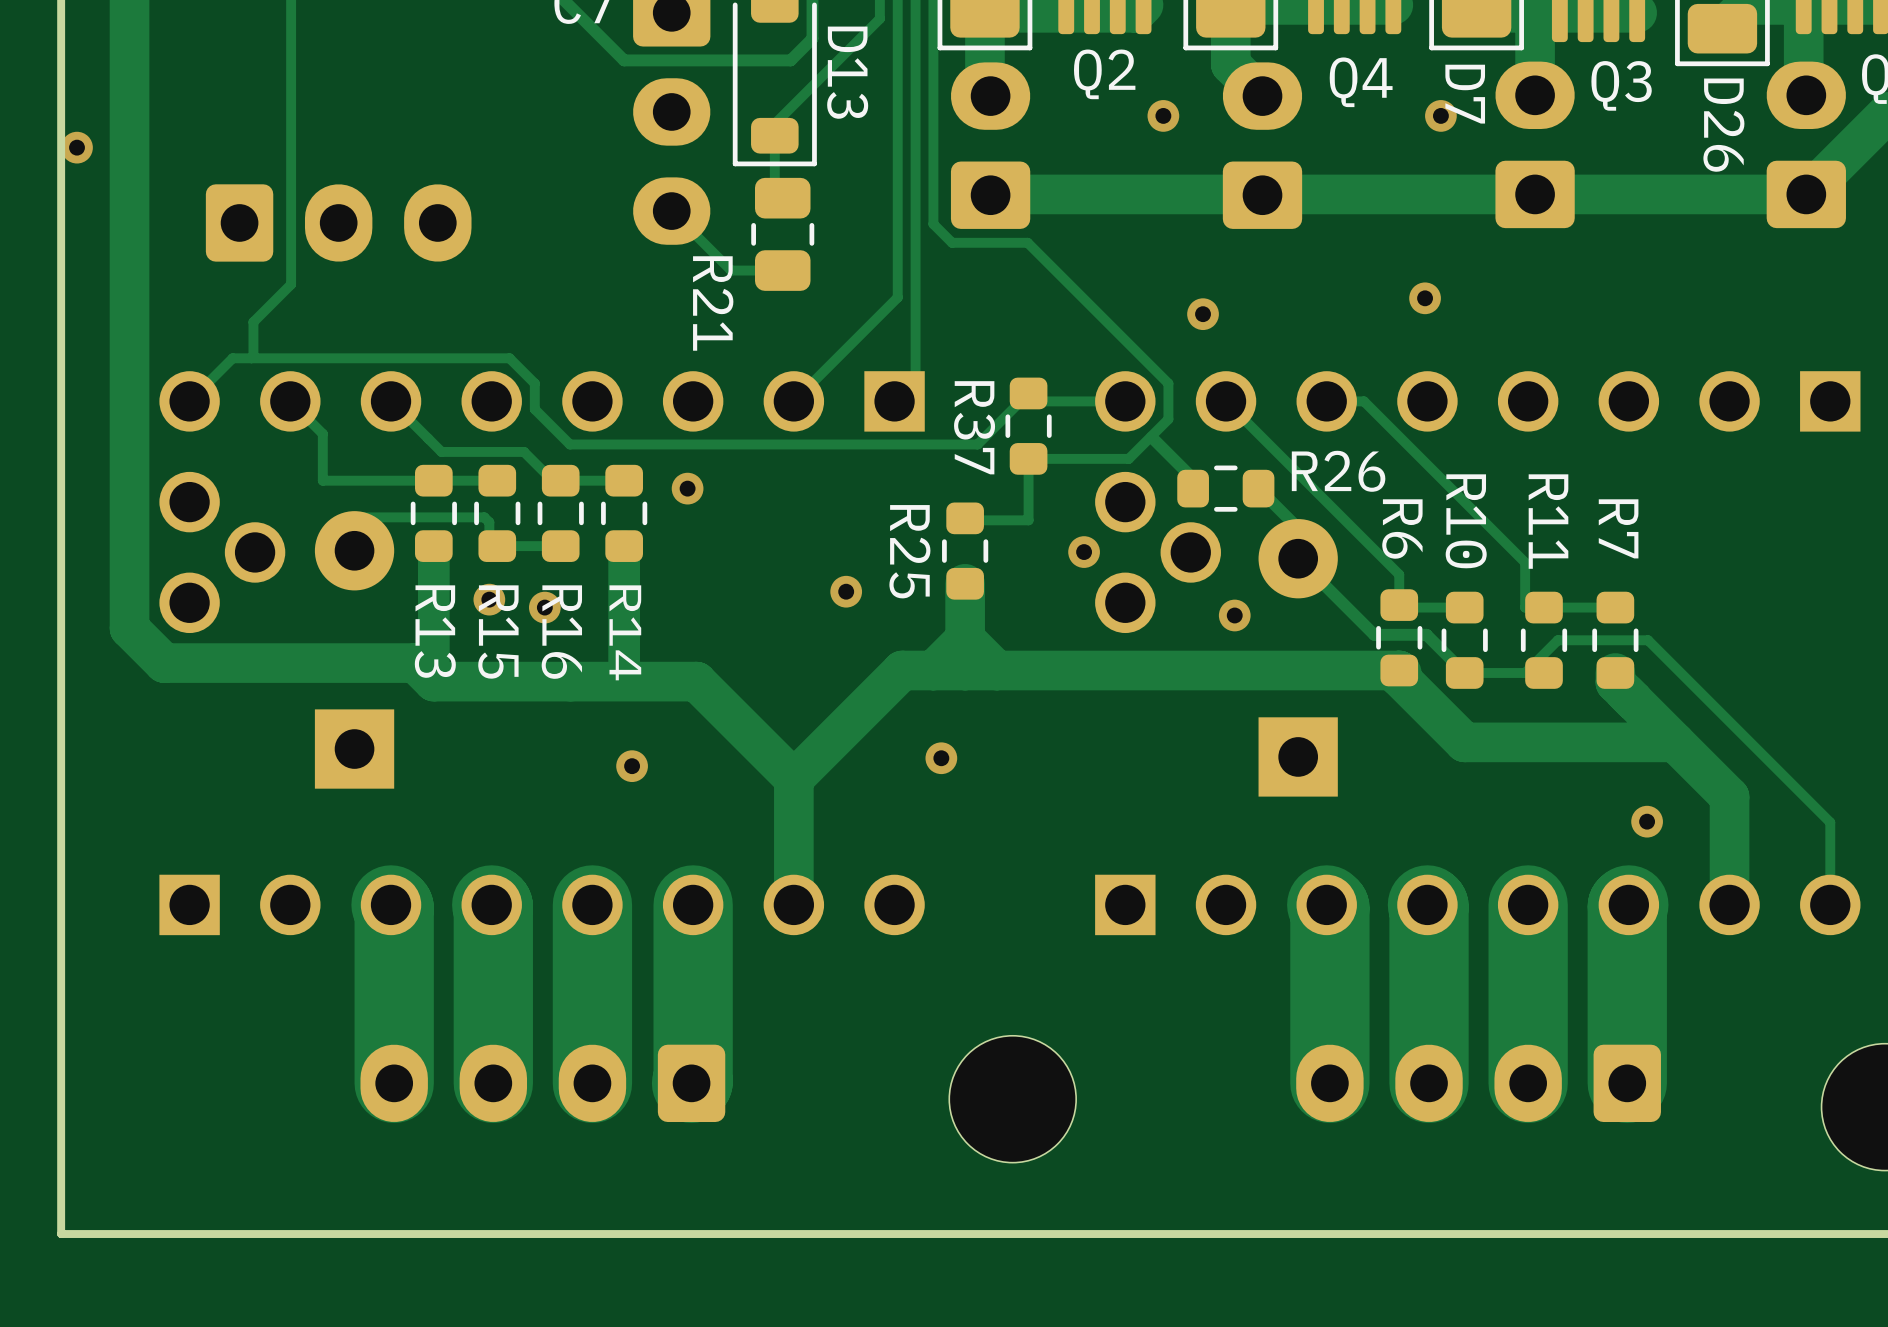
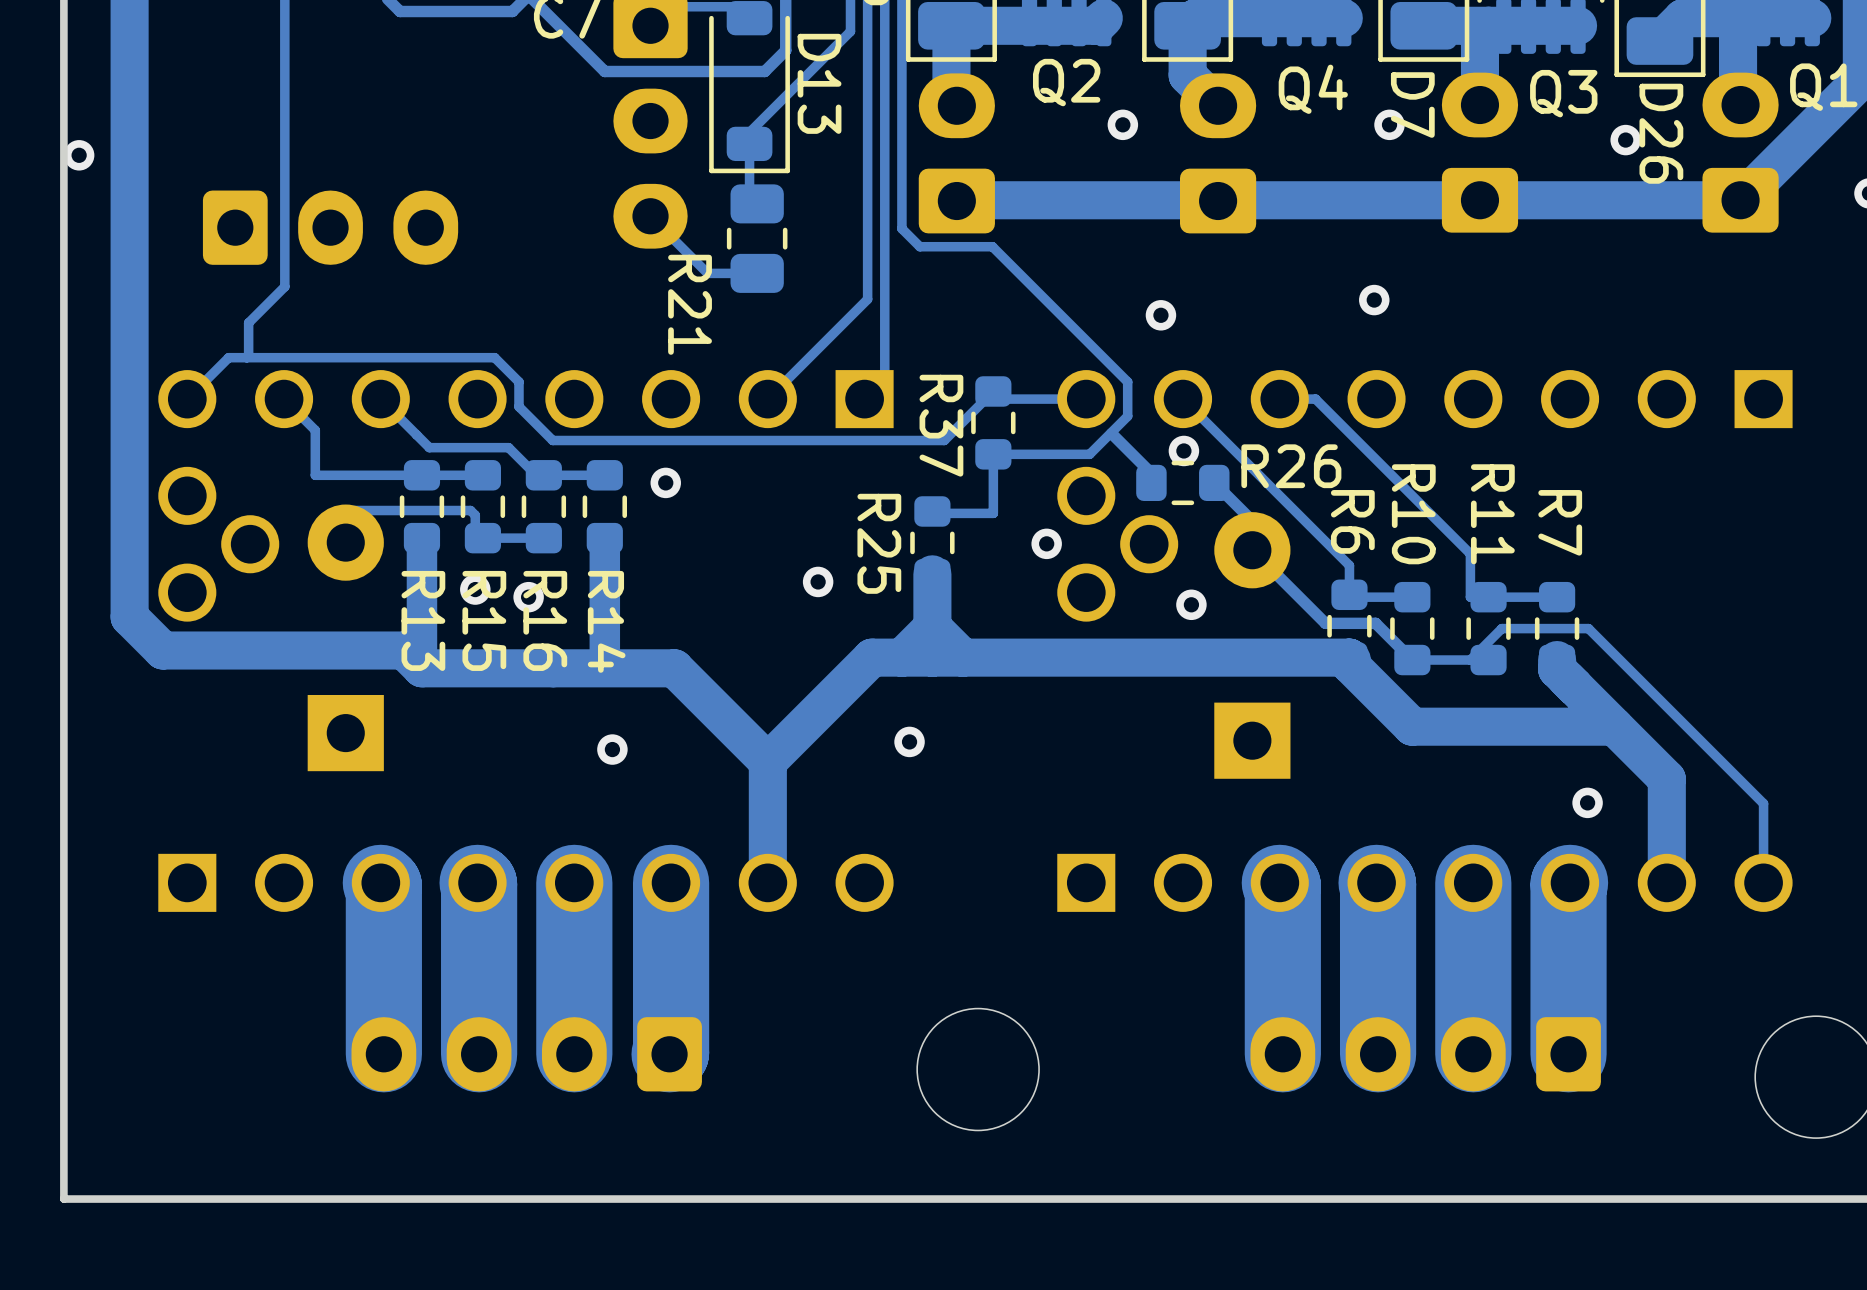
via: none -> (1625, 140)
via: none -> (1183, 450)

